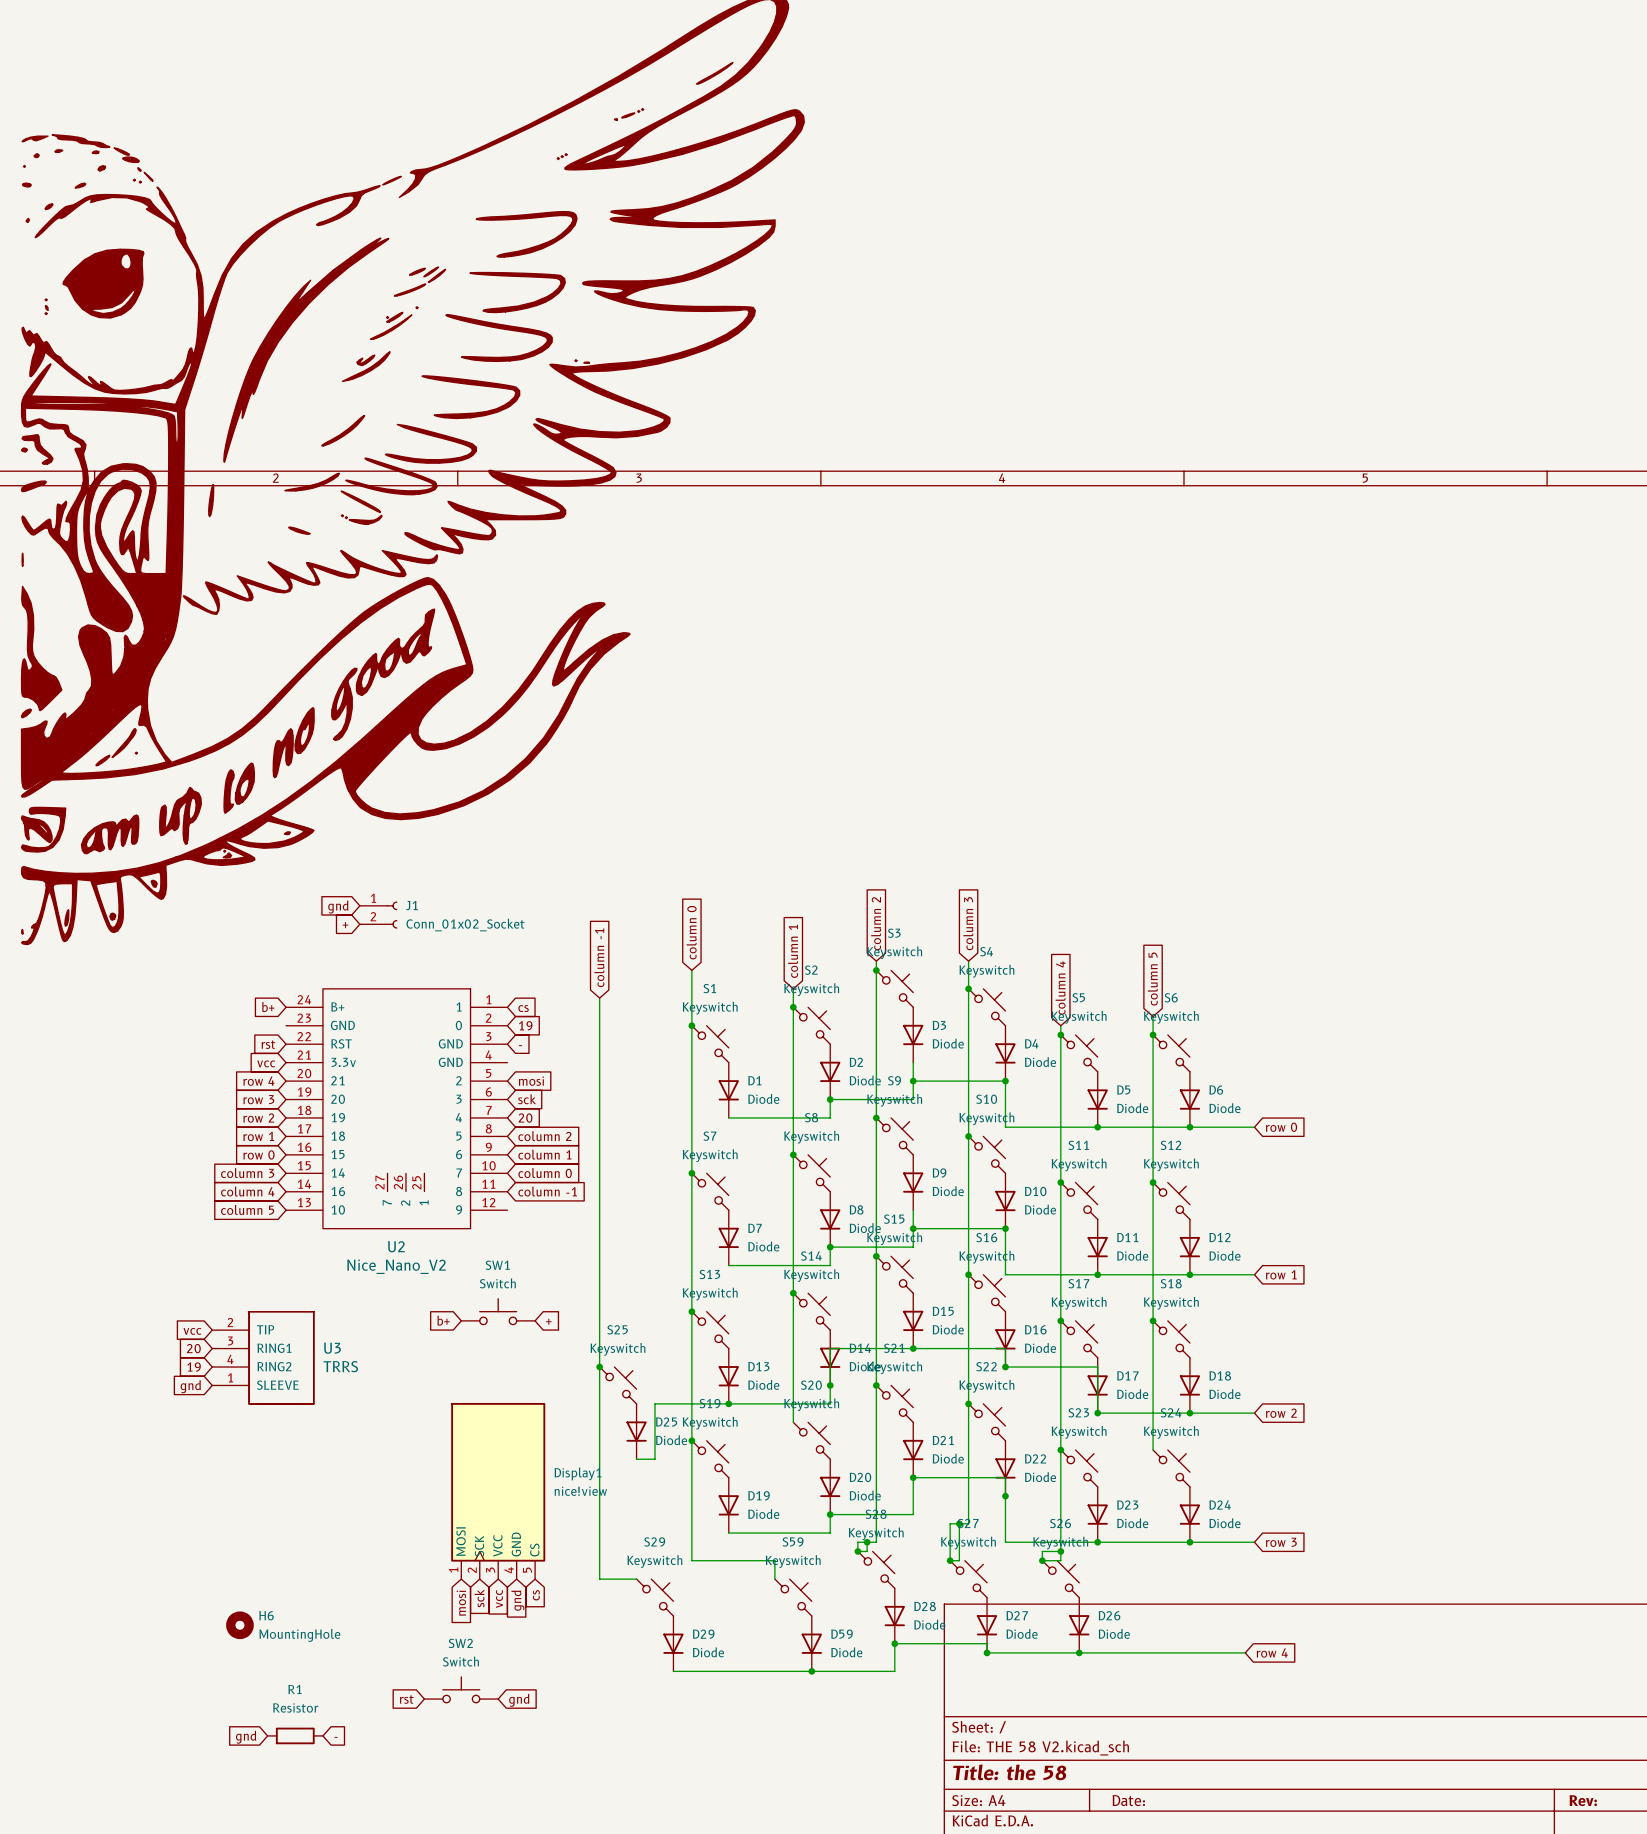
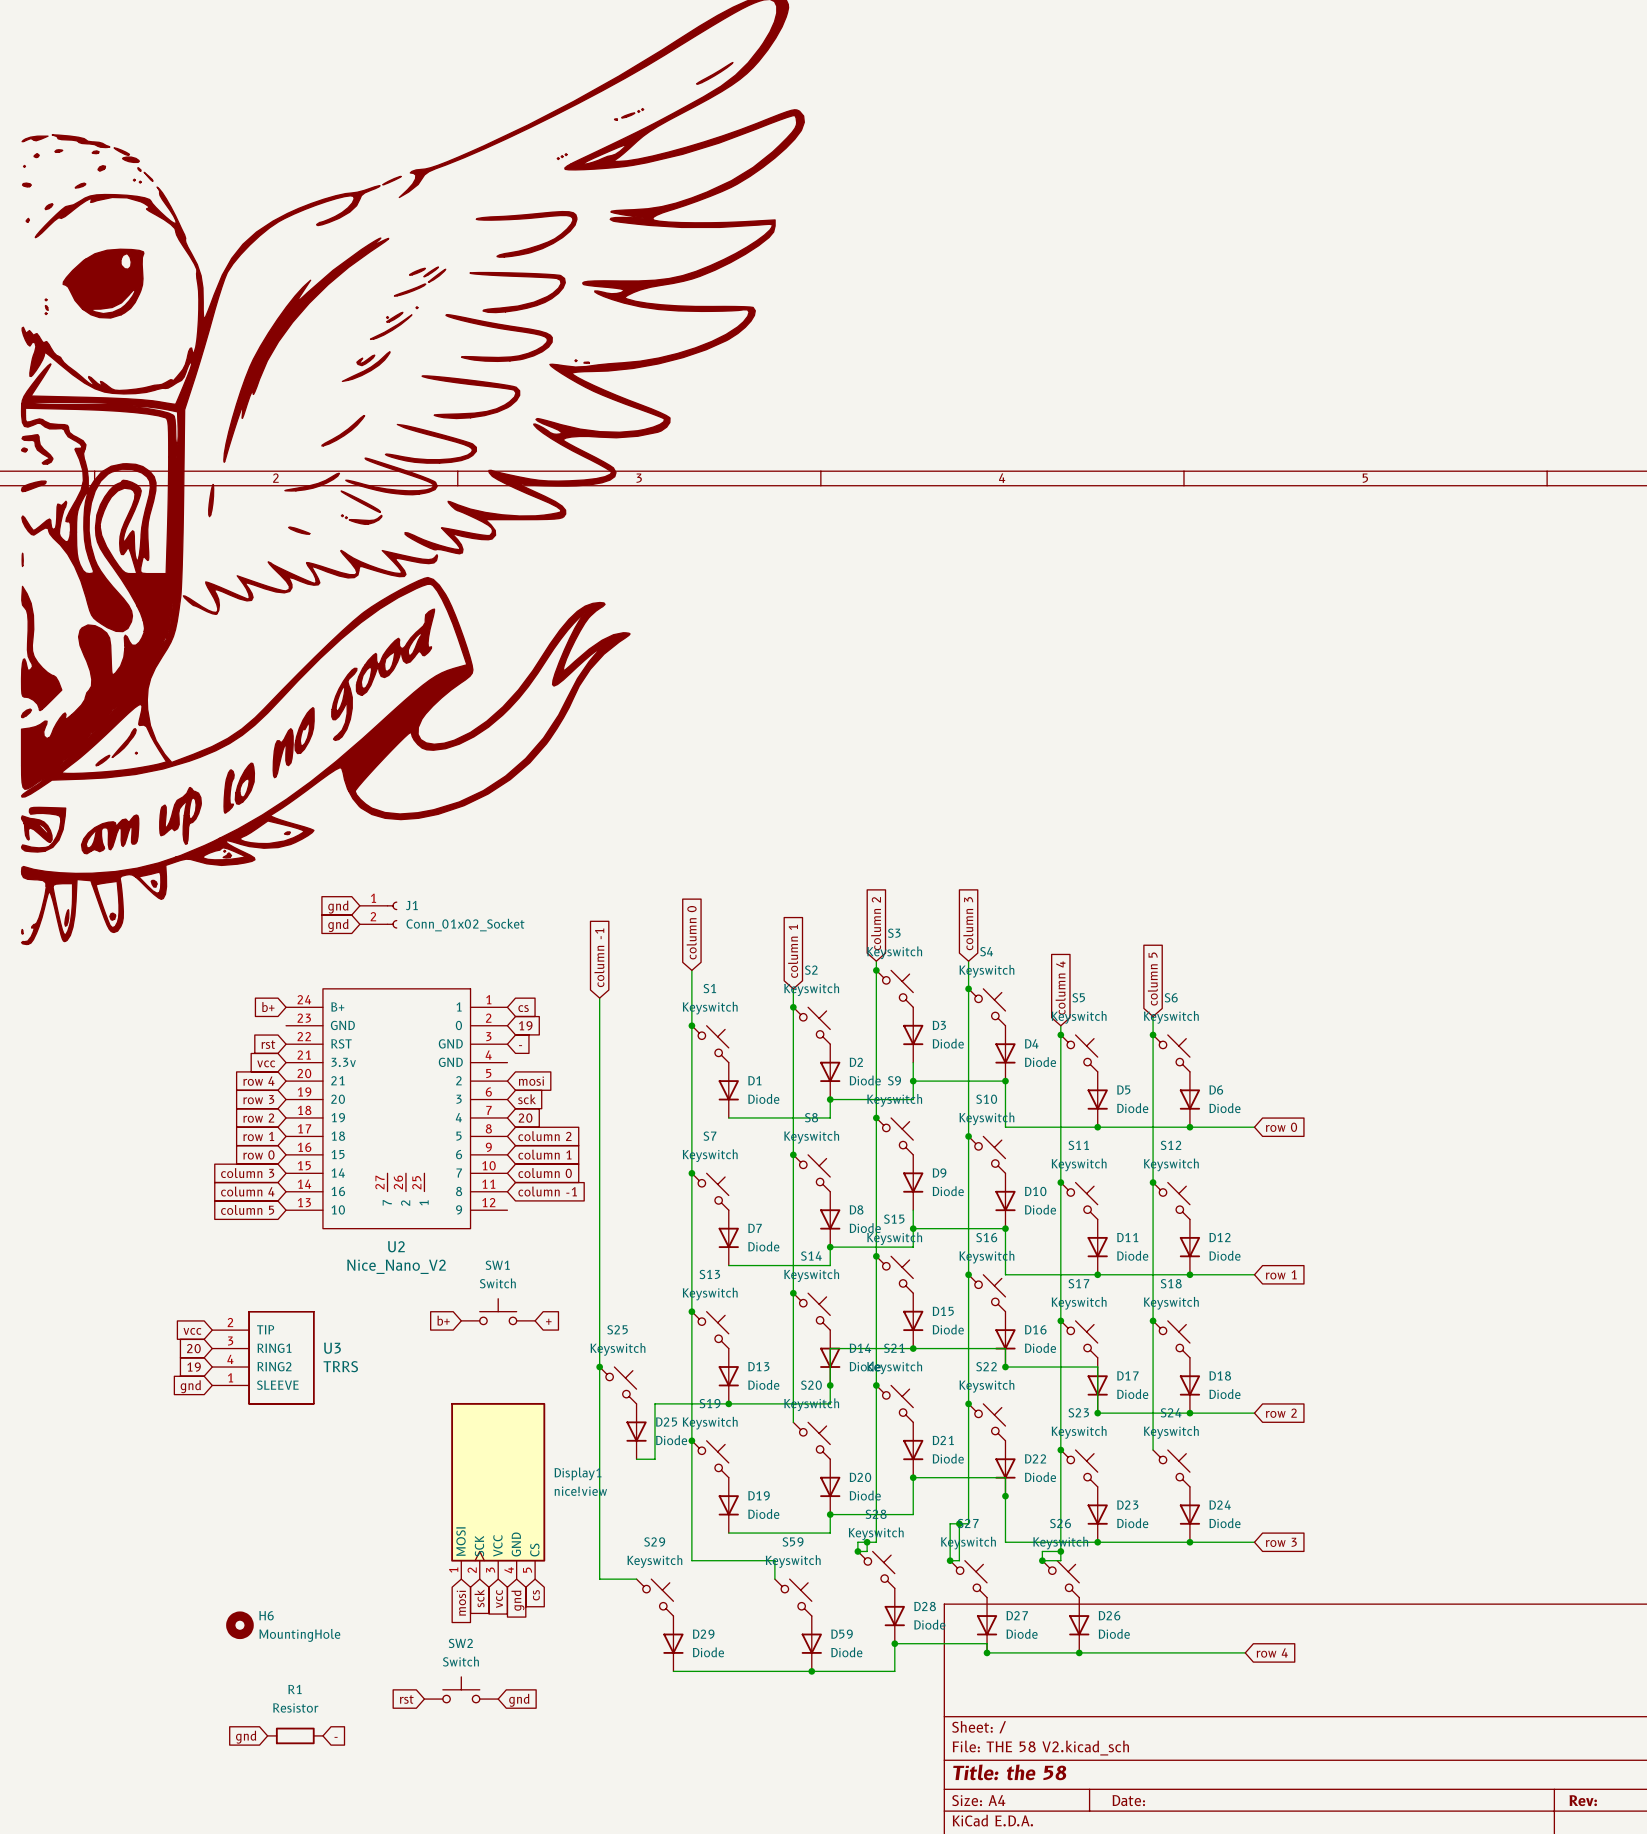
global label: + (345, 925) -> gnd (338, 925)

